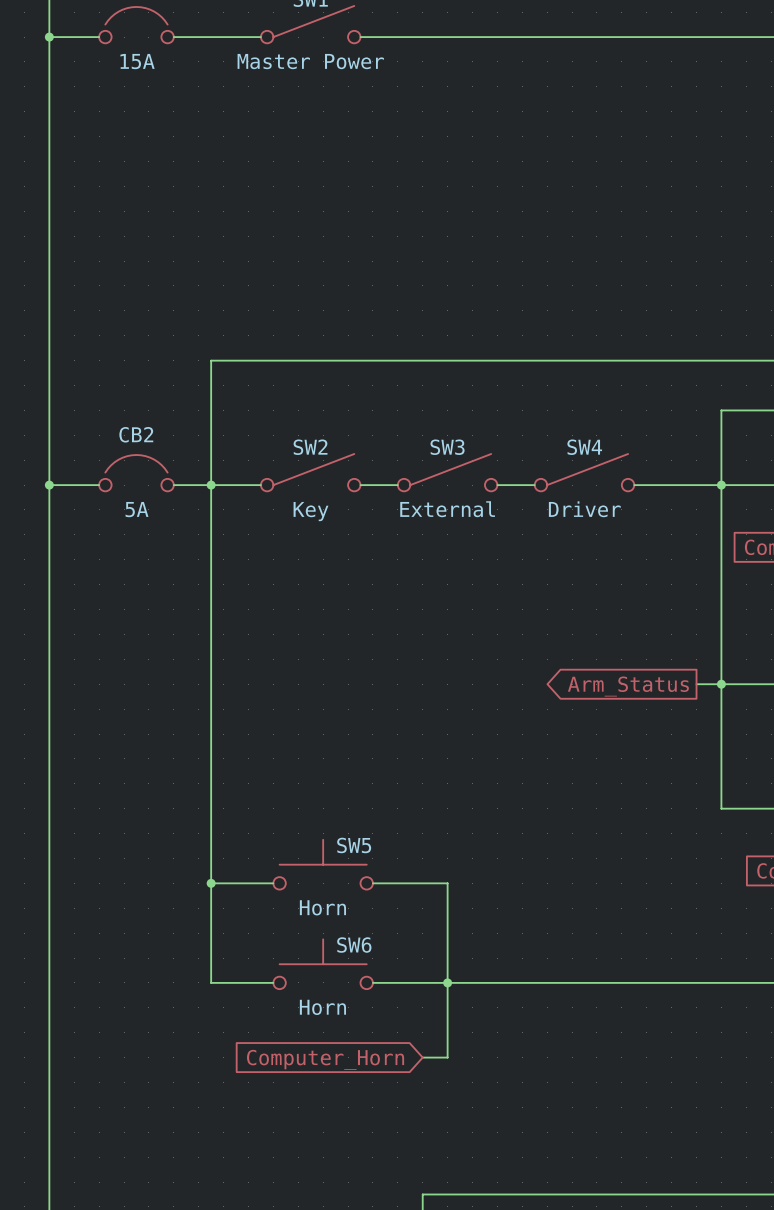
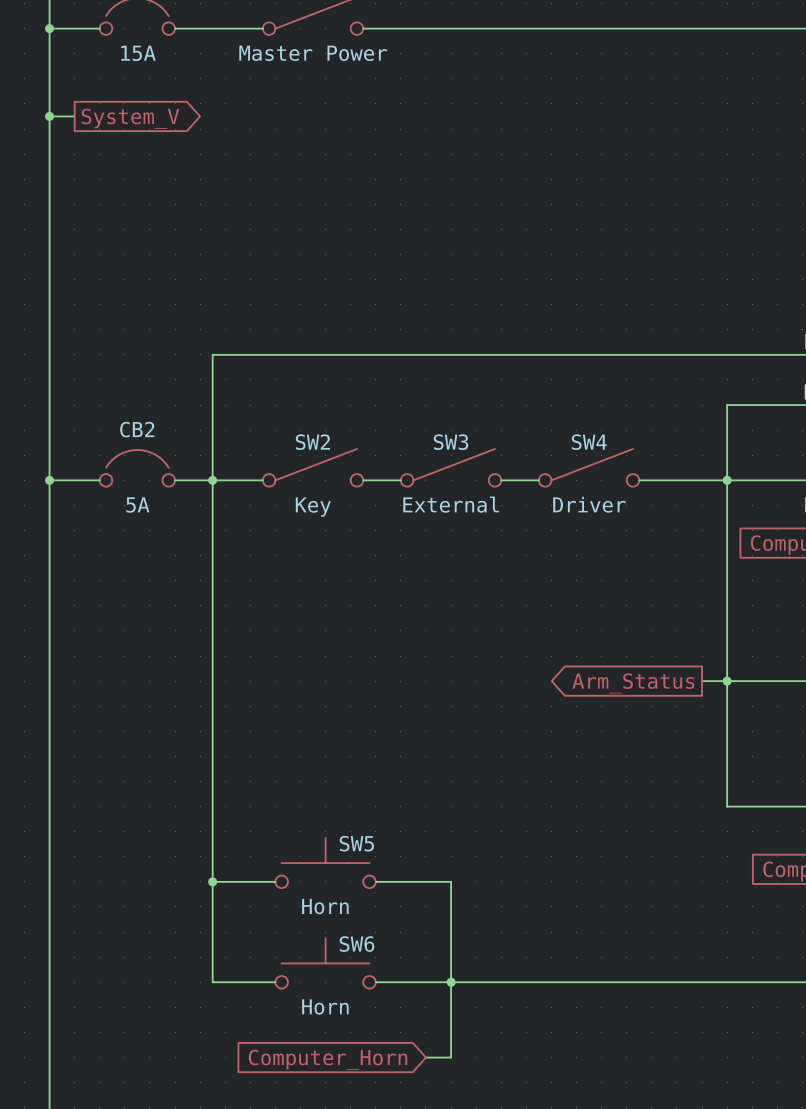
wire: none -> (49, 116) (74, 116)
junction: none -> (49, 116)
global label: none -> System_V (130, 118)

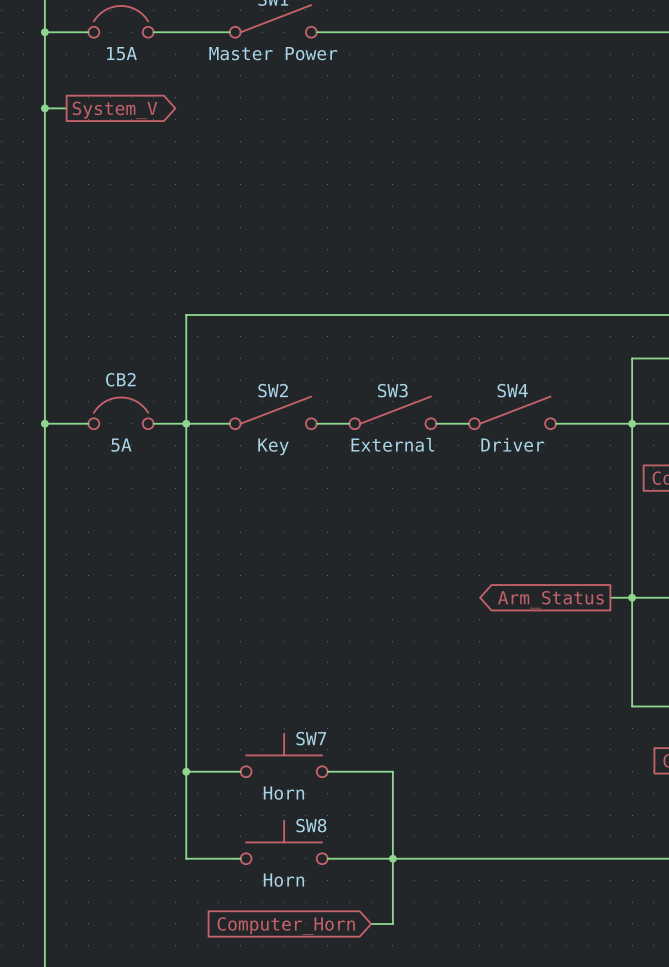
SW5 name: SW5 (356, 843) -> SW7 (311, 738)
SW6 name: SW6 (357, 944) -> SW8 (311, 825)

